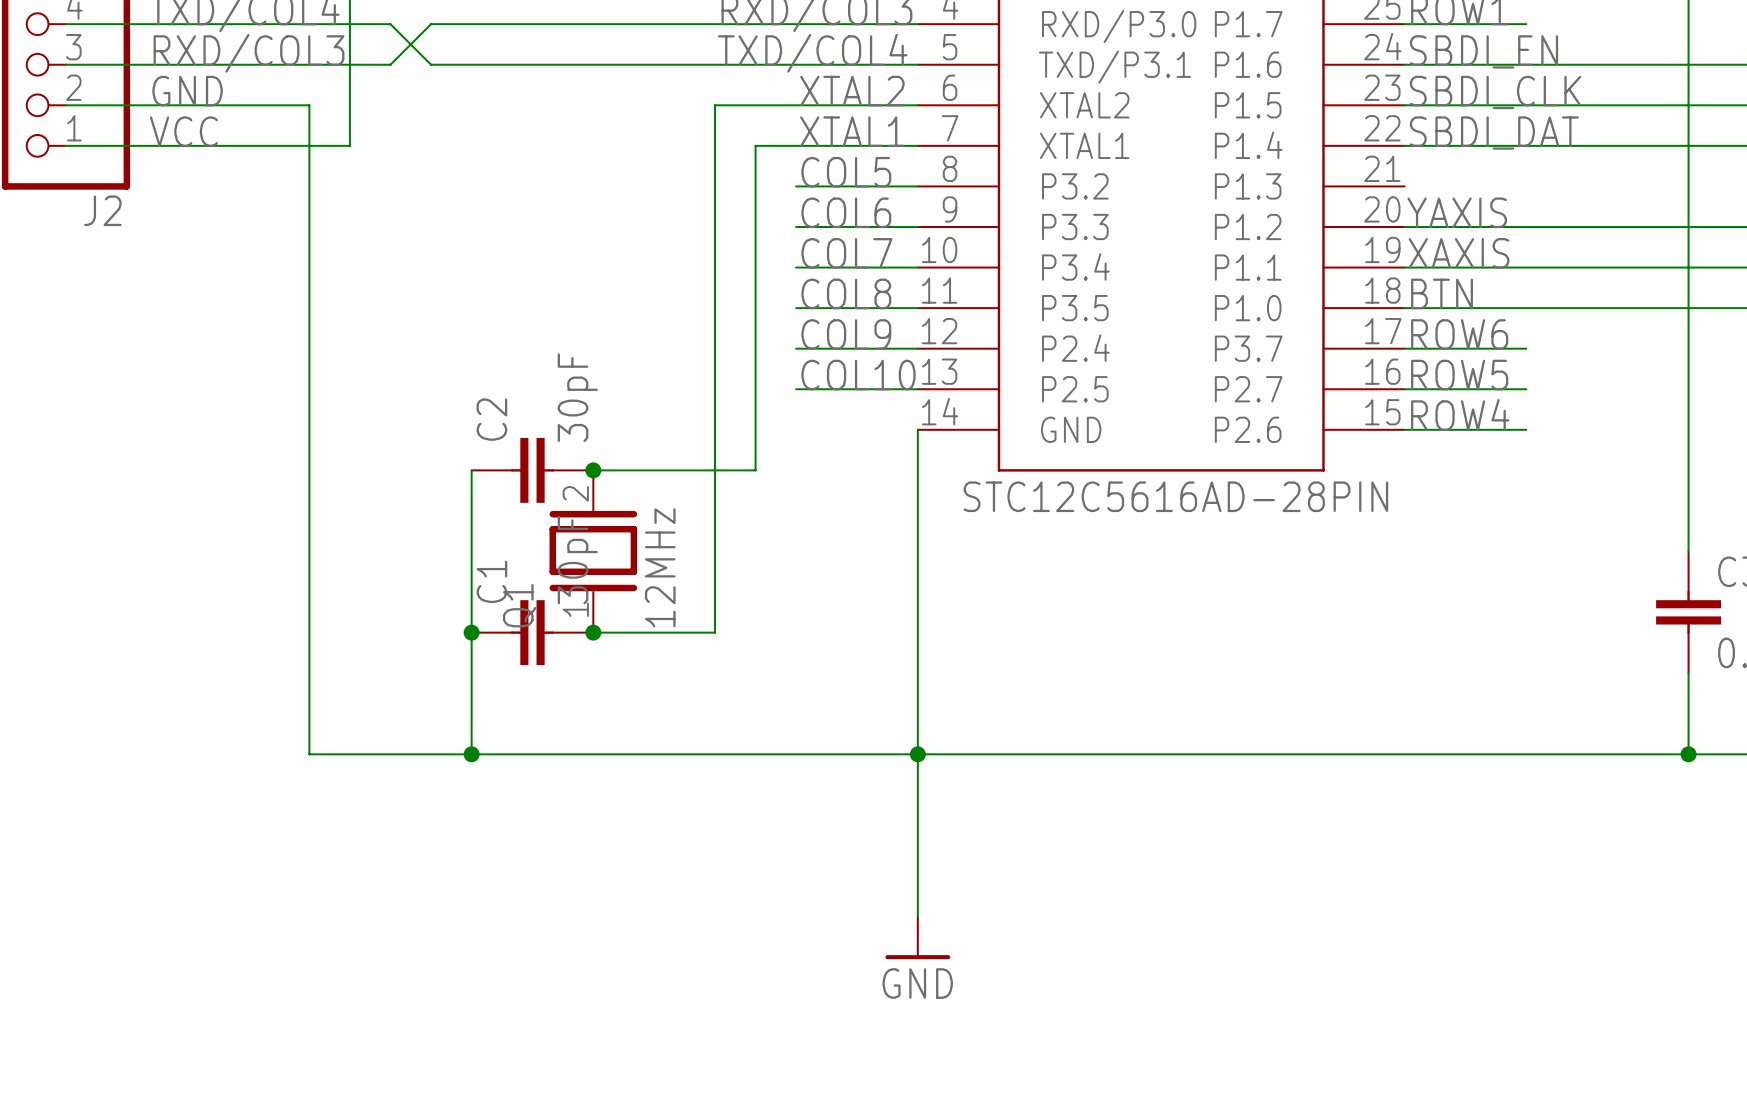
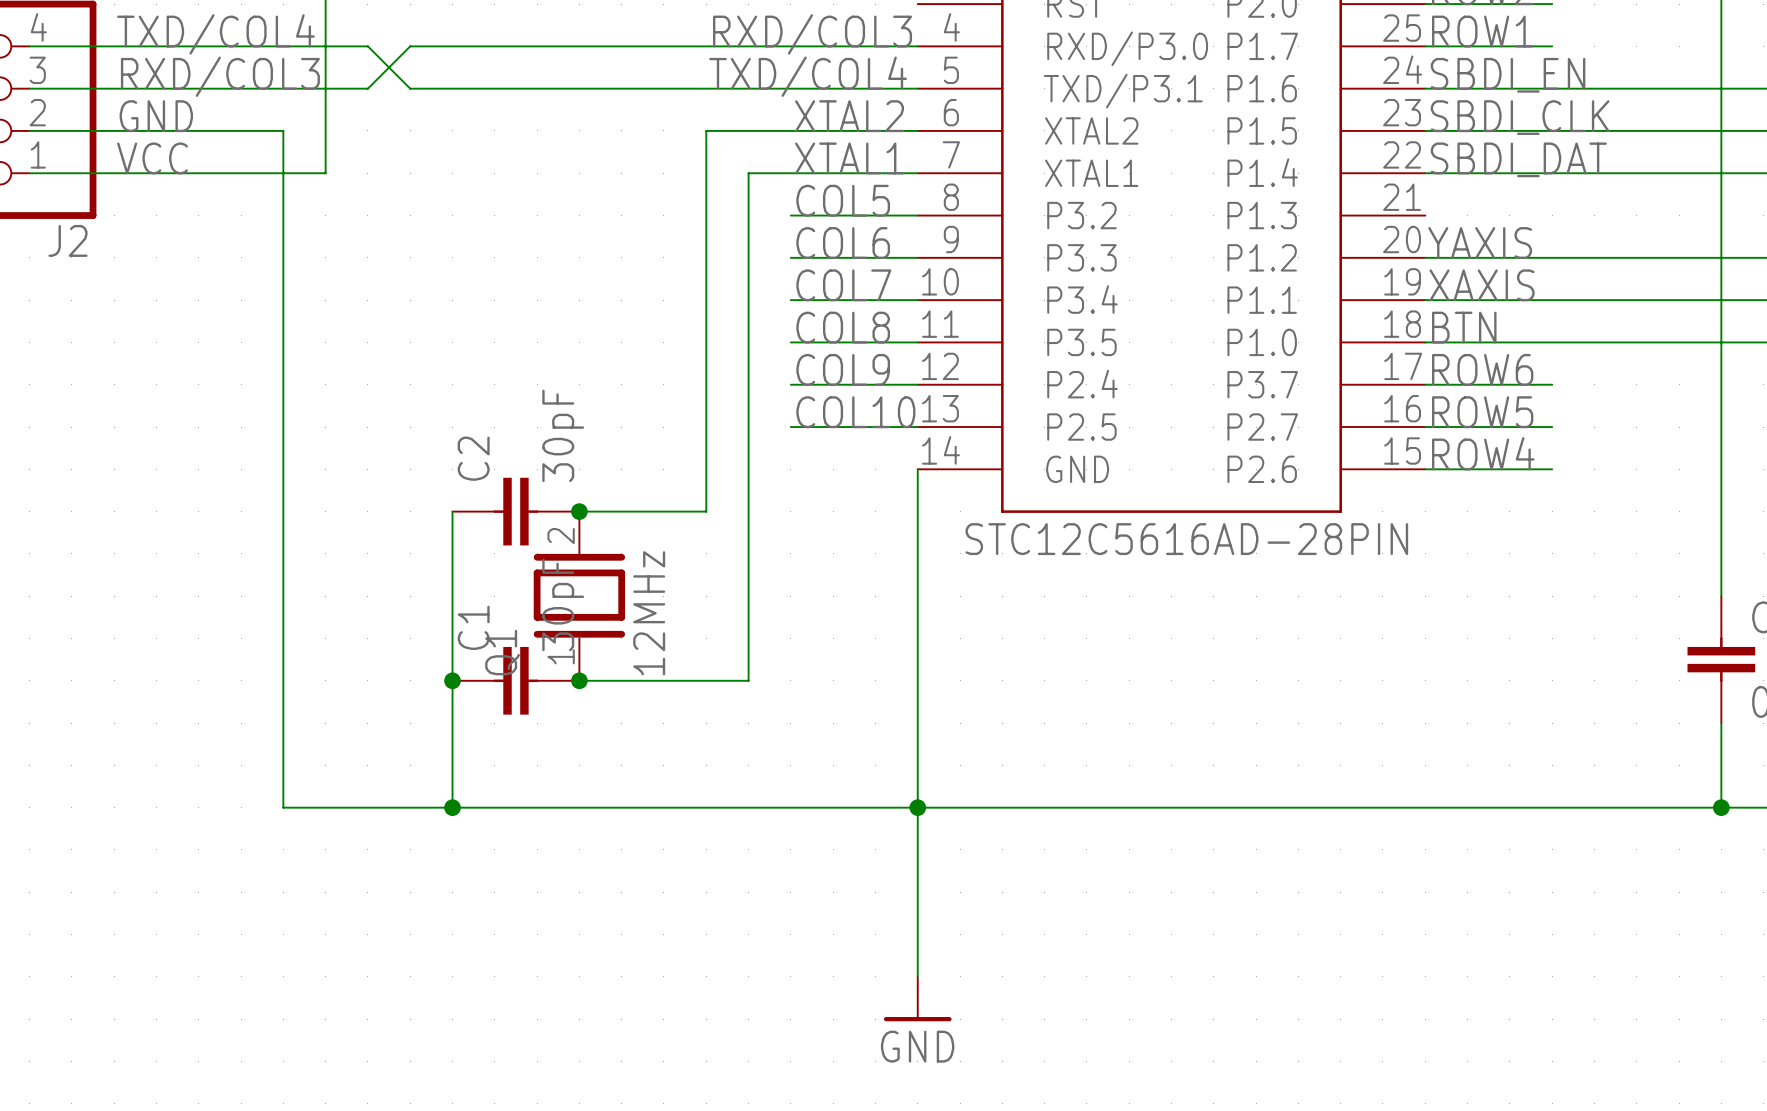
wire: (755, 470) (715, 470) (715, 632) -> (748, 511) (748, 680) (706, 680)

